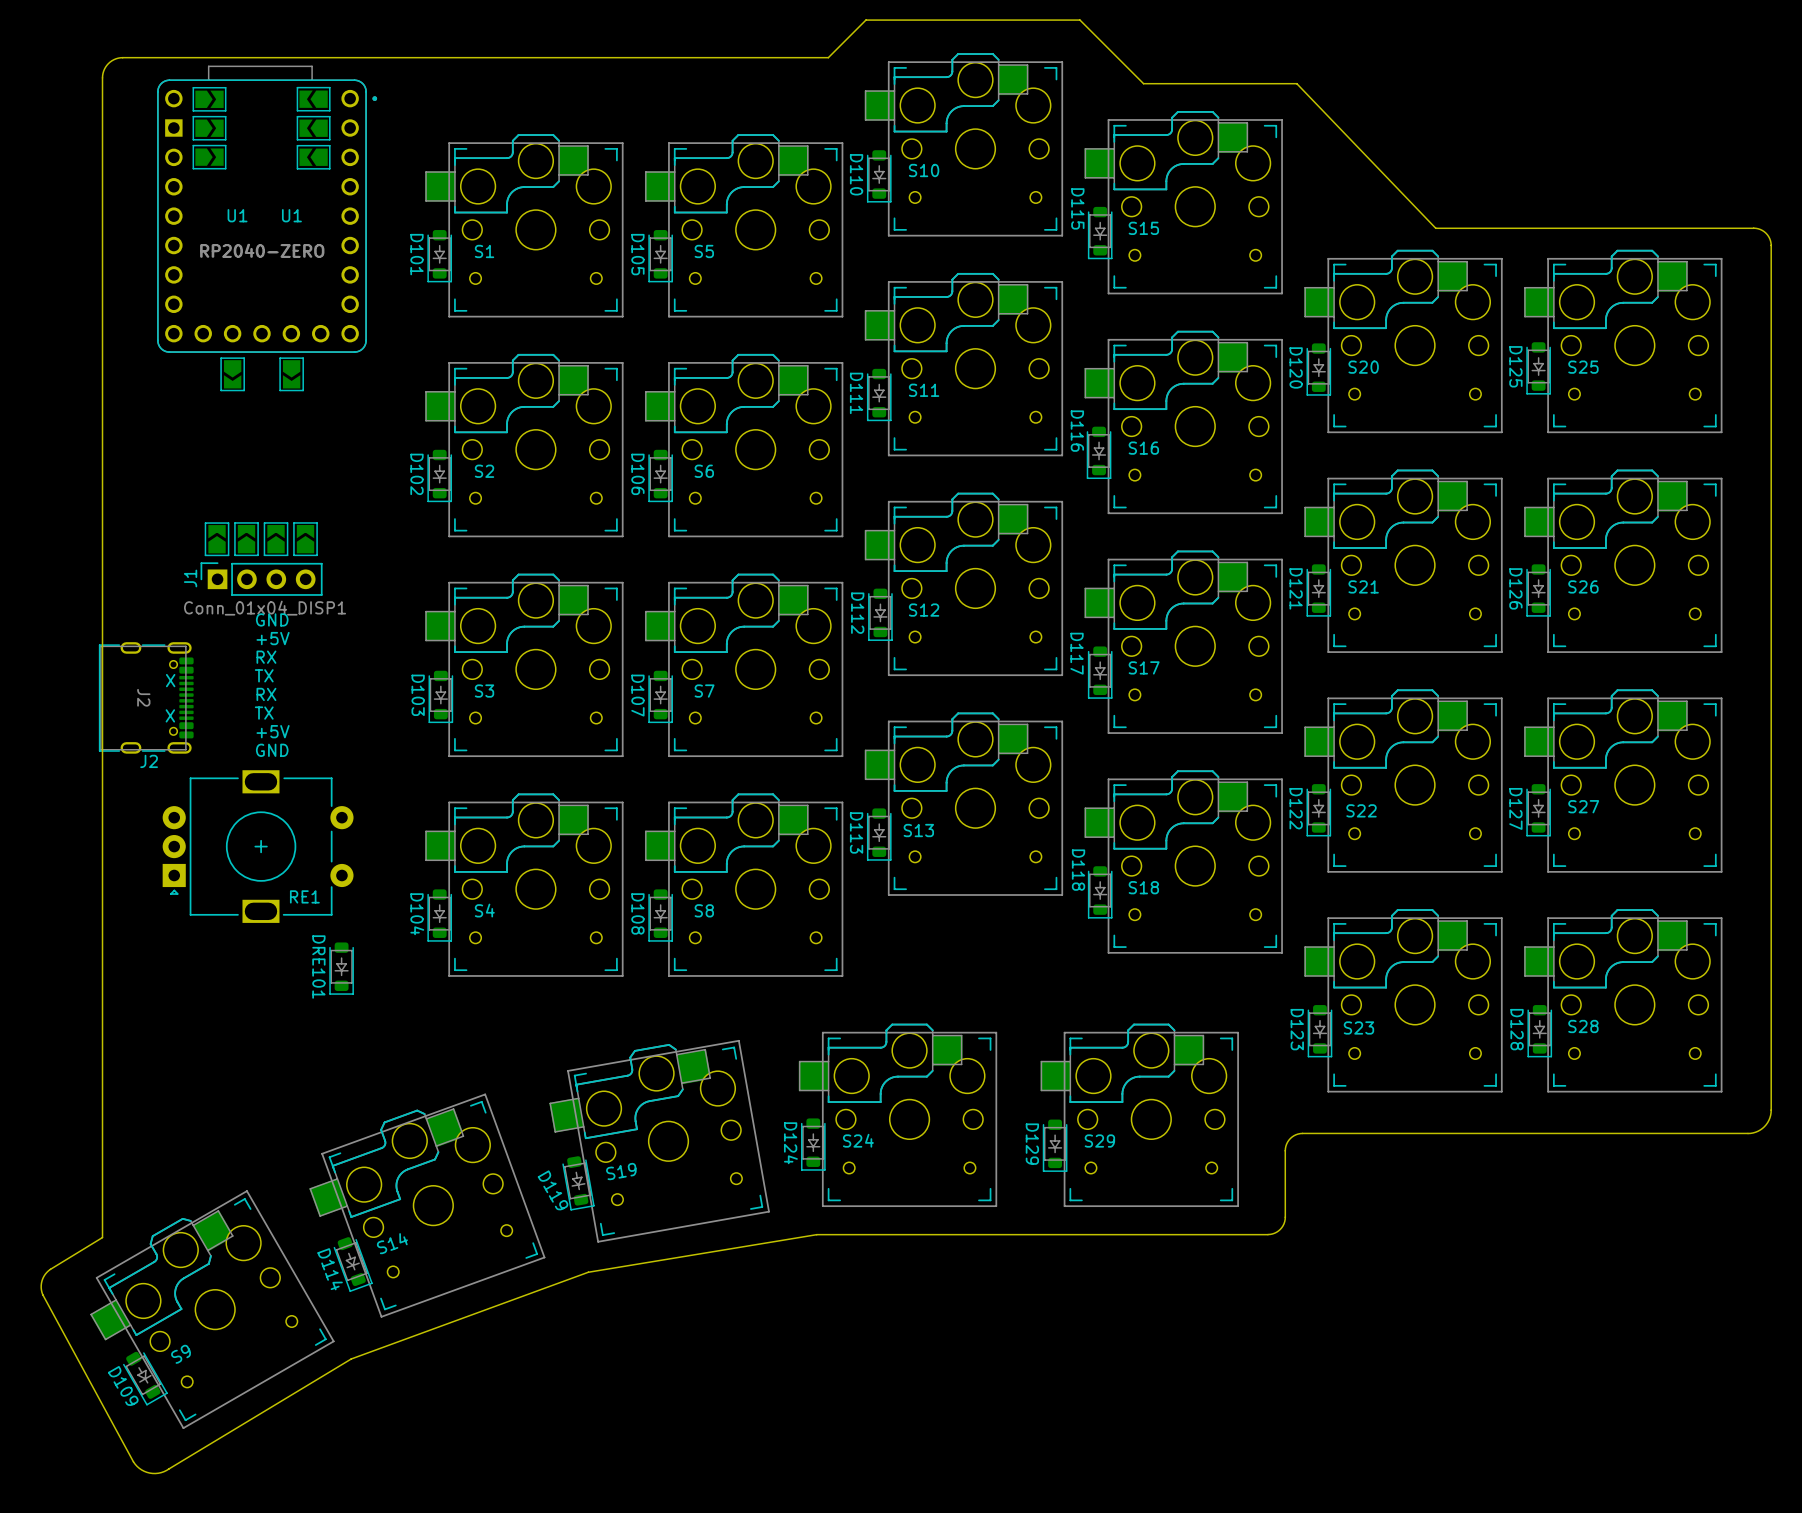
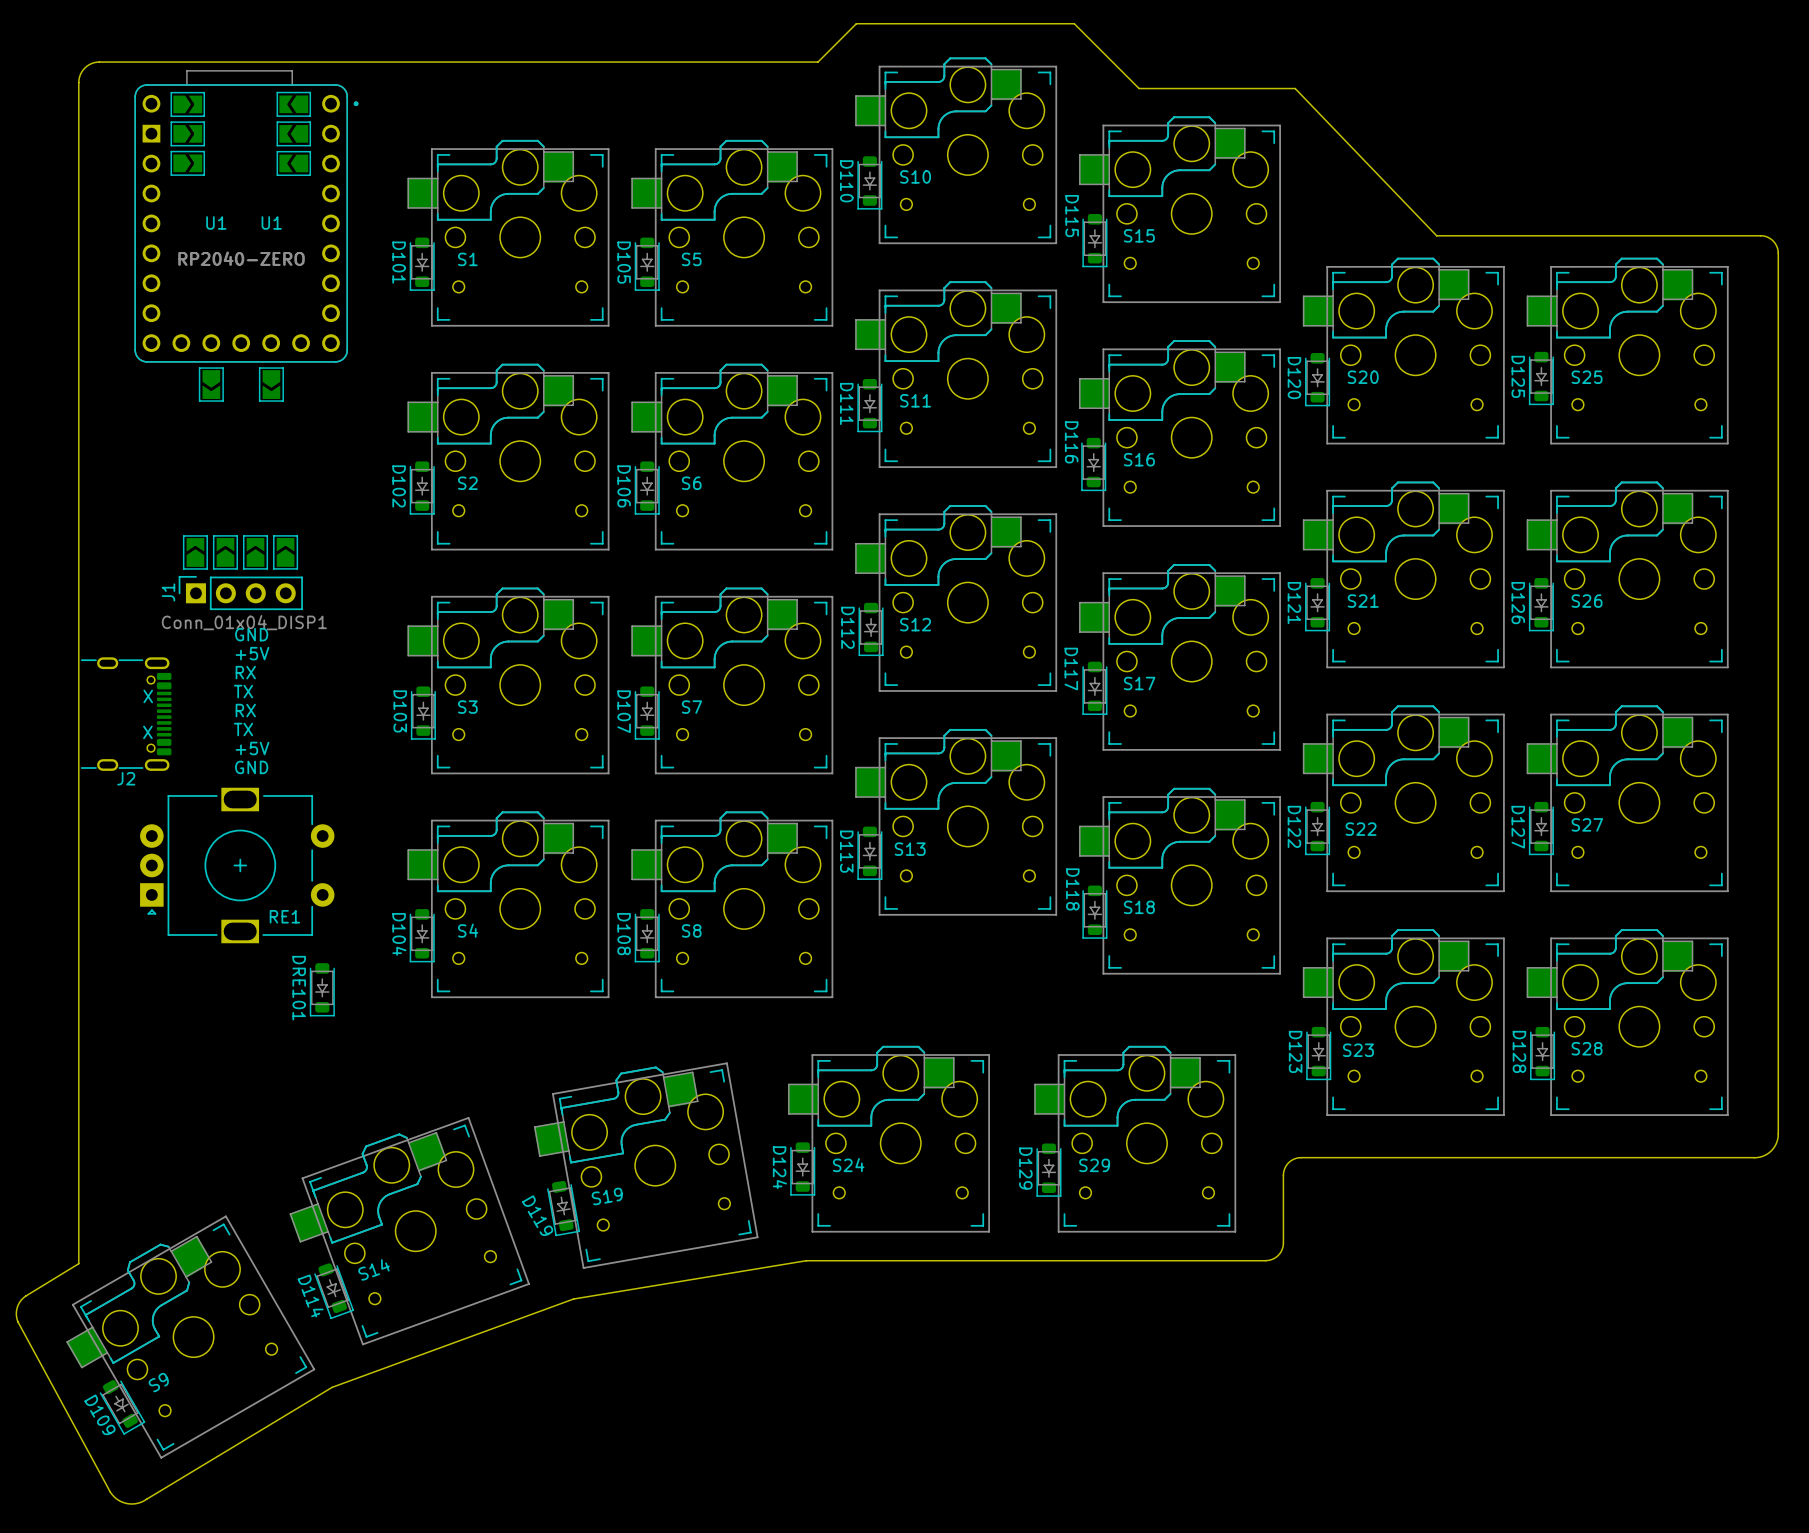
line: none -> (95, 660) (81, 660)
line: none -> (142, 660) (119, 660)
J2: (146, 697) -> none
part: none -> (134, 714)
line: none -> (95, 768) (81, 768)
line: none -> (142, 768) (119, 768)

